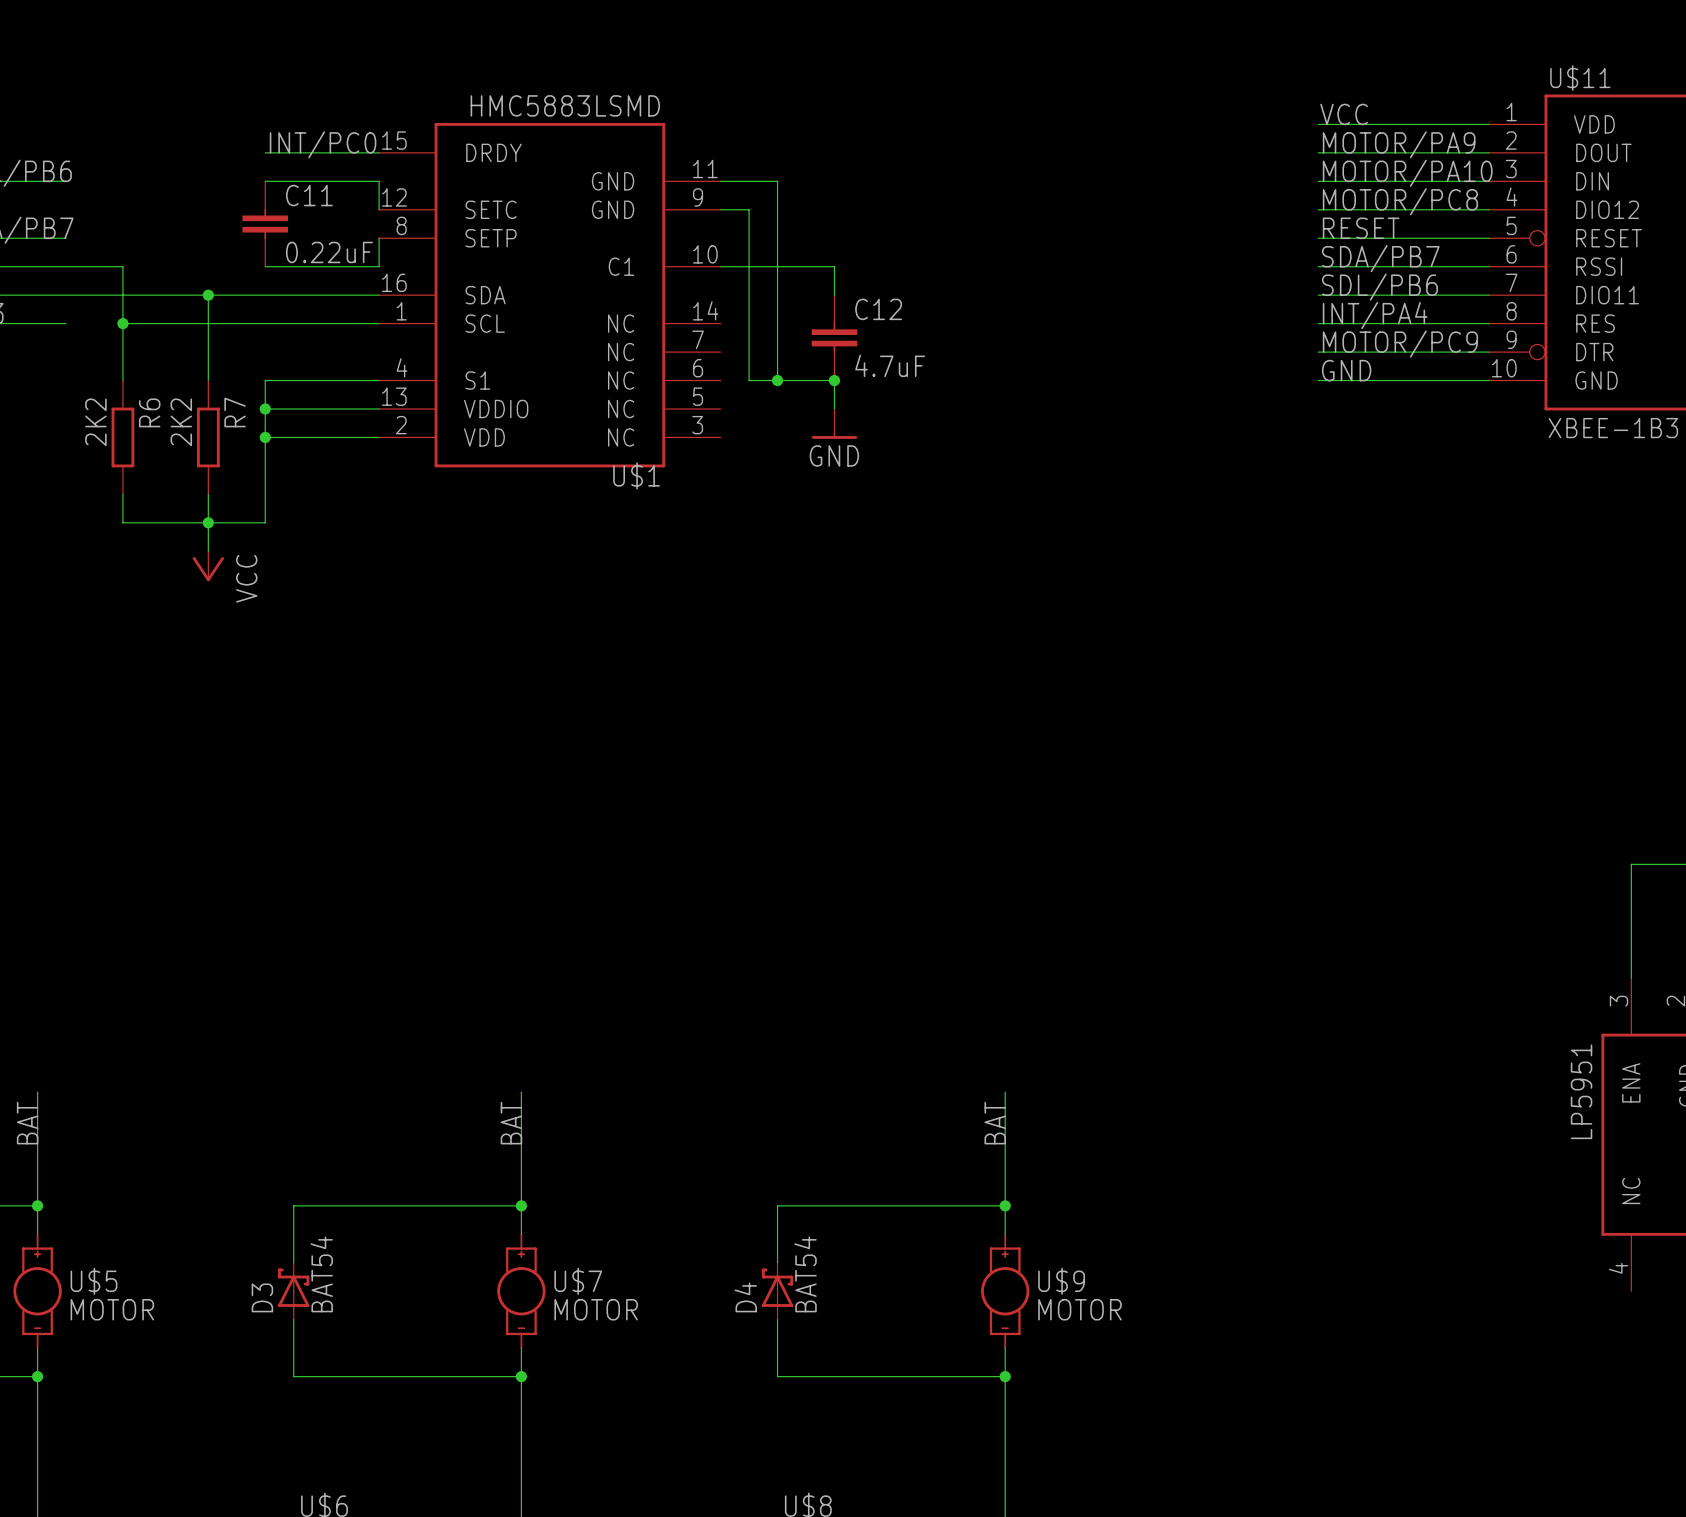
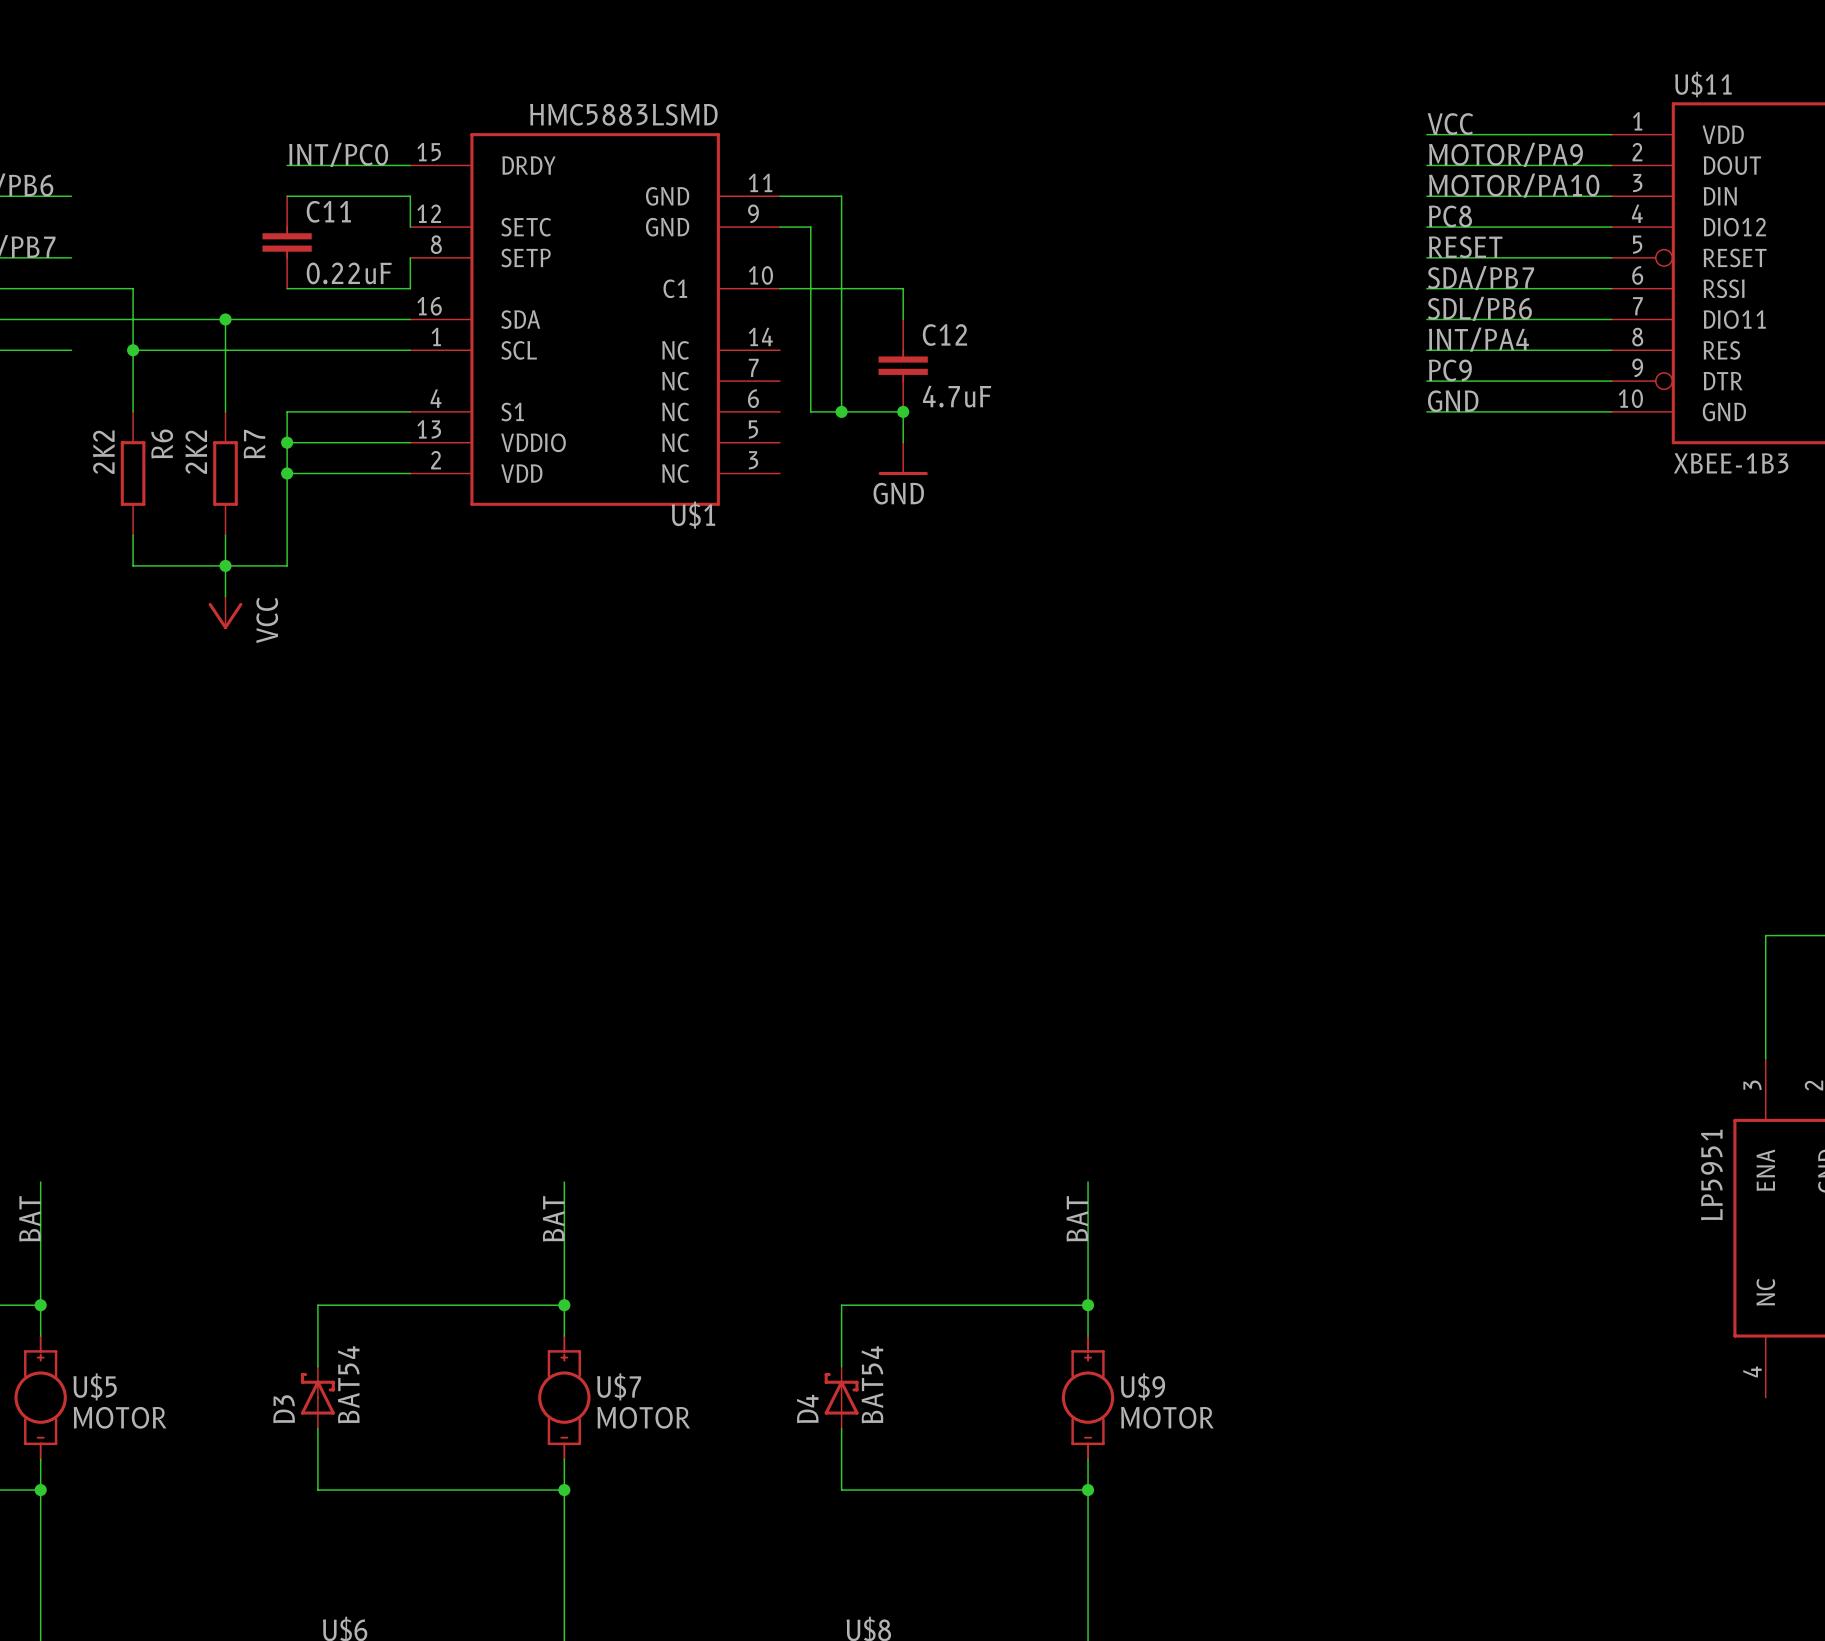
label: MOTOR/PC8 (1400, 201) -> PC8 (1450, 216)
label: MOTOR/PC9 (1400, 344) -> PC9 (1450, 370)

